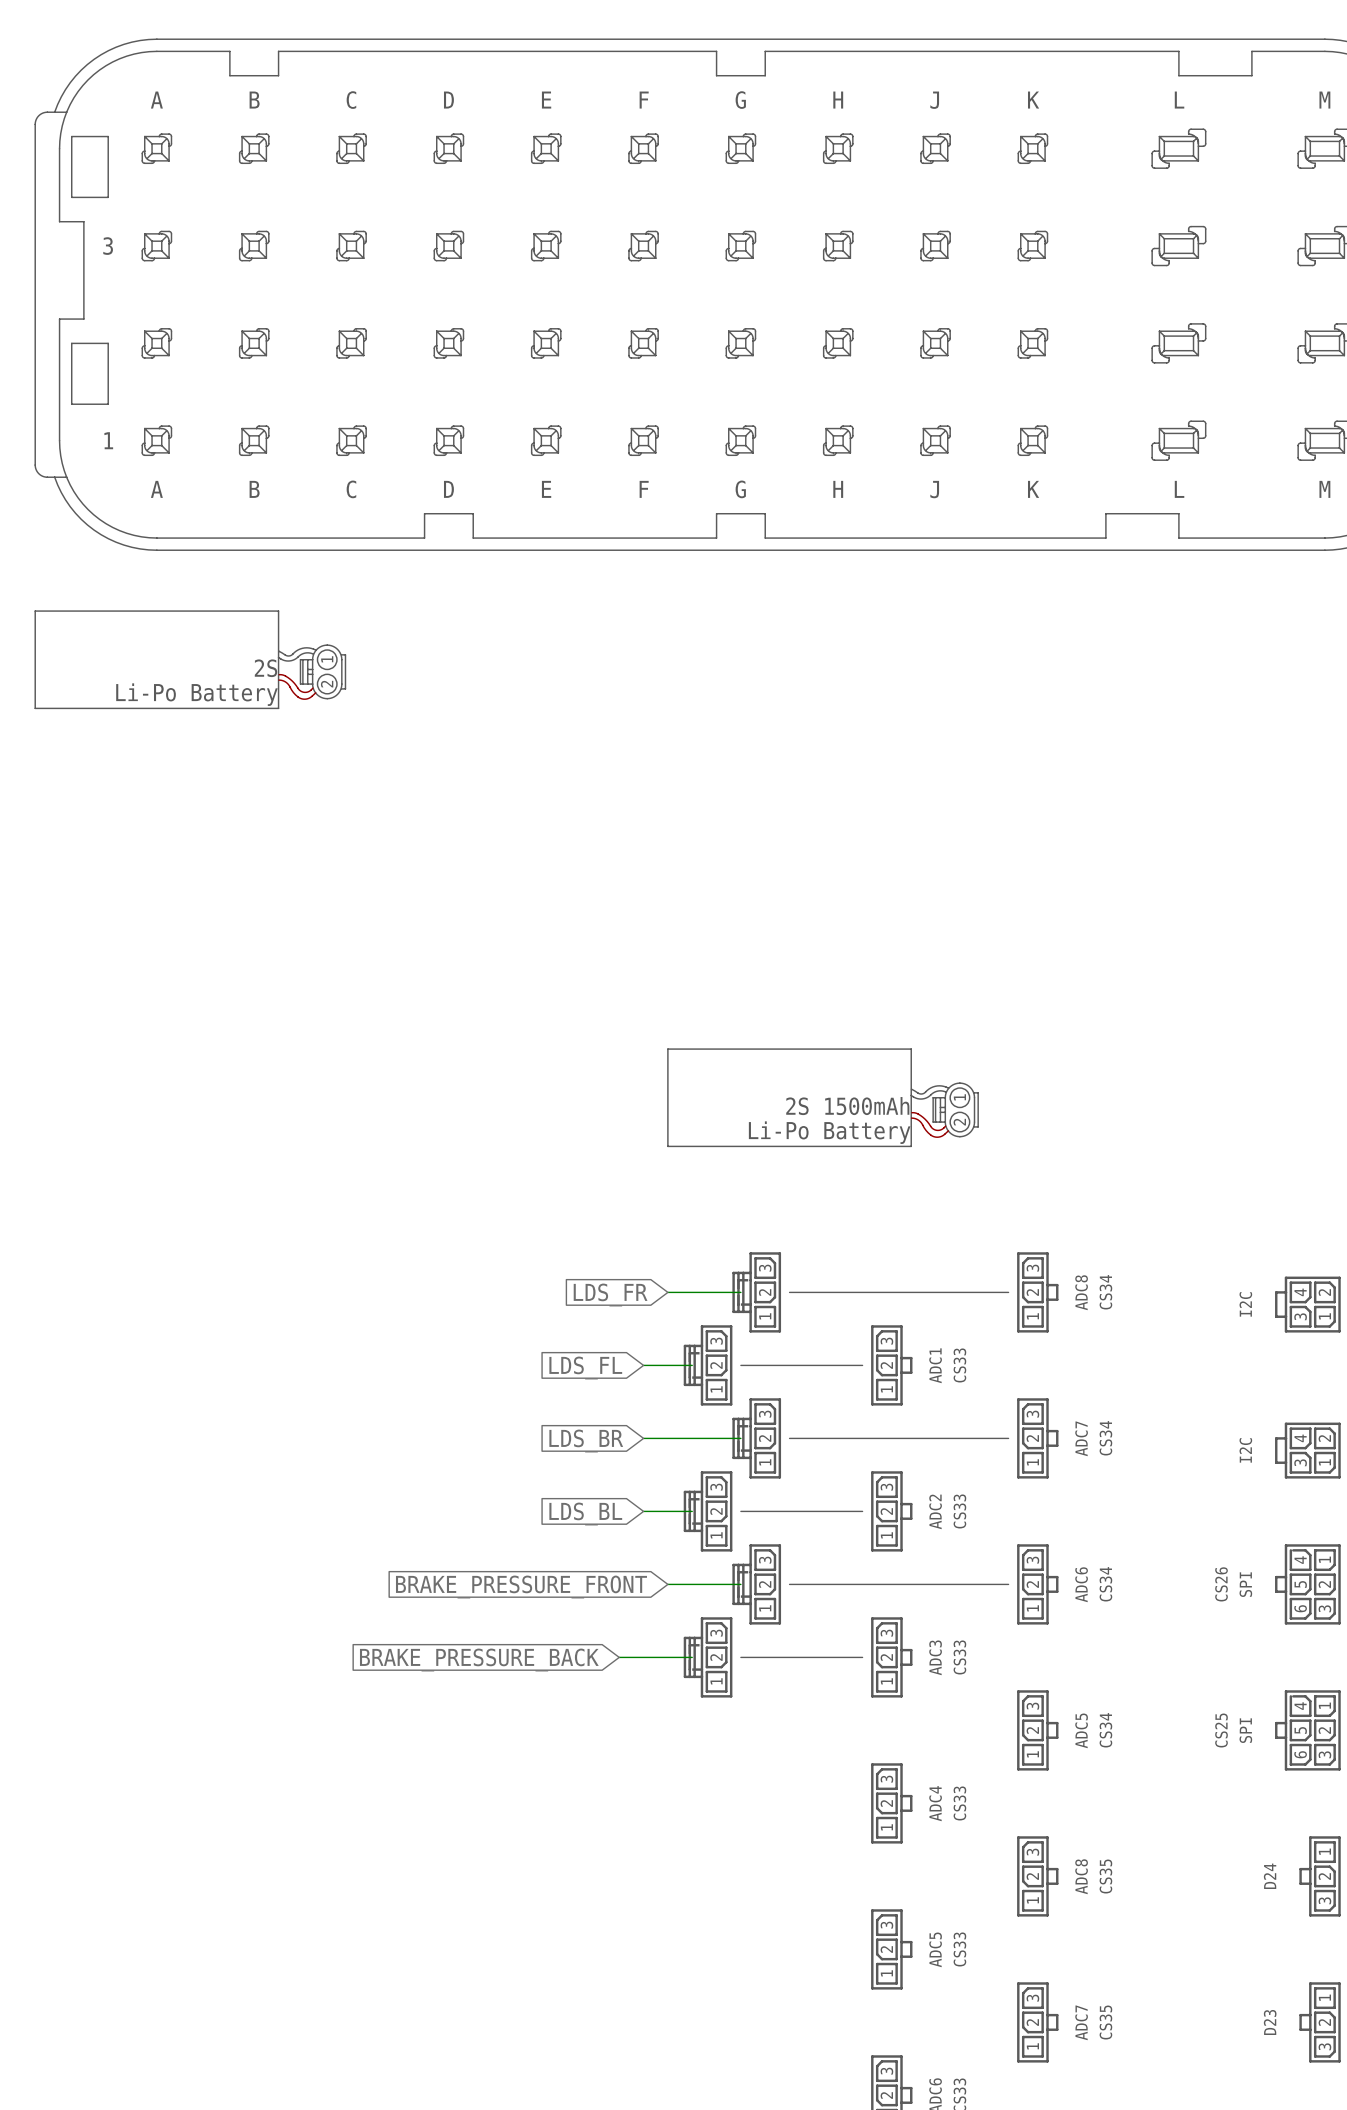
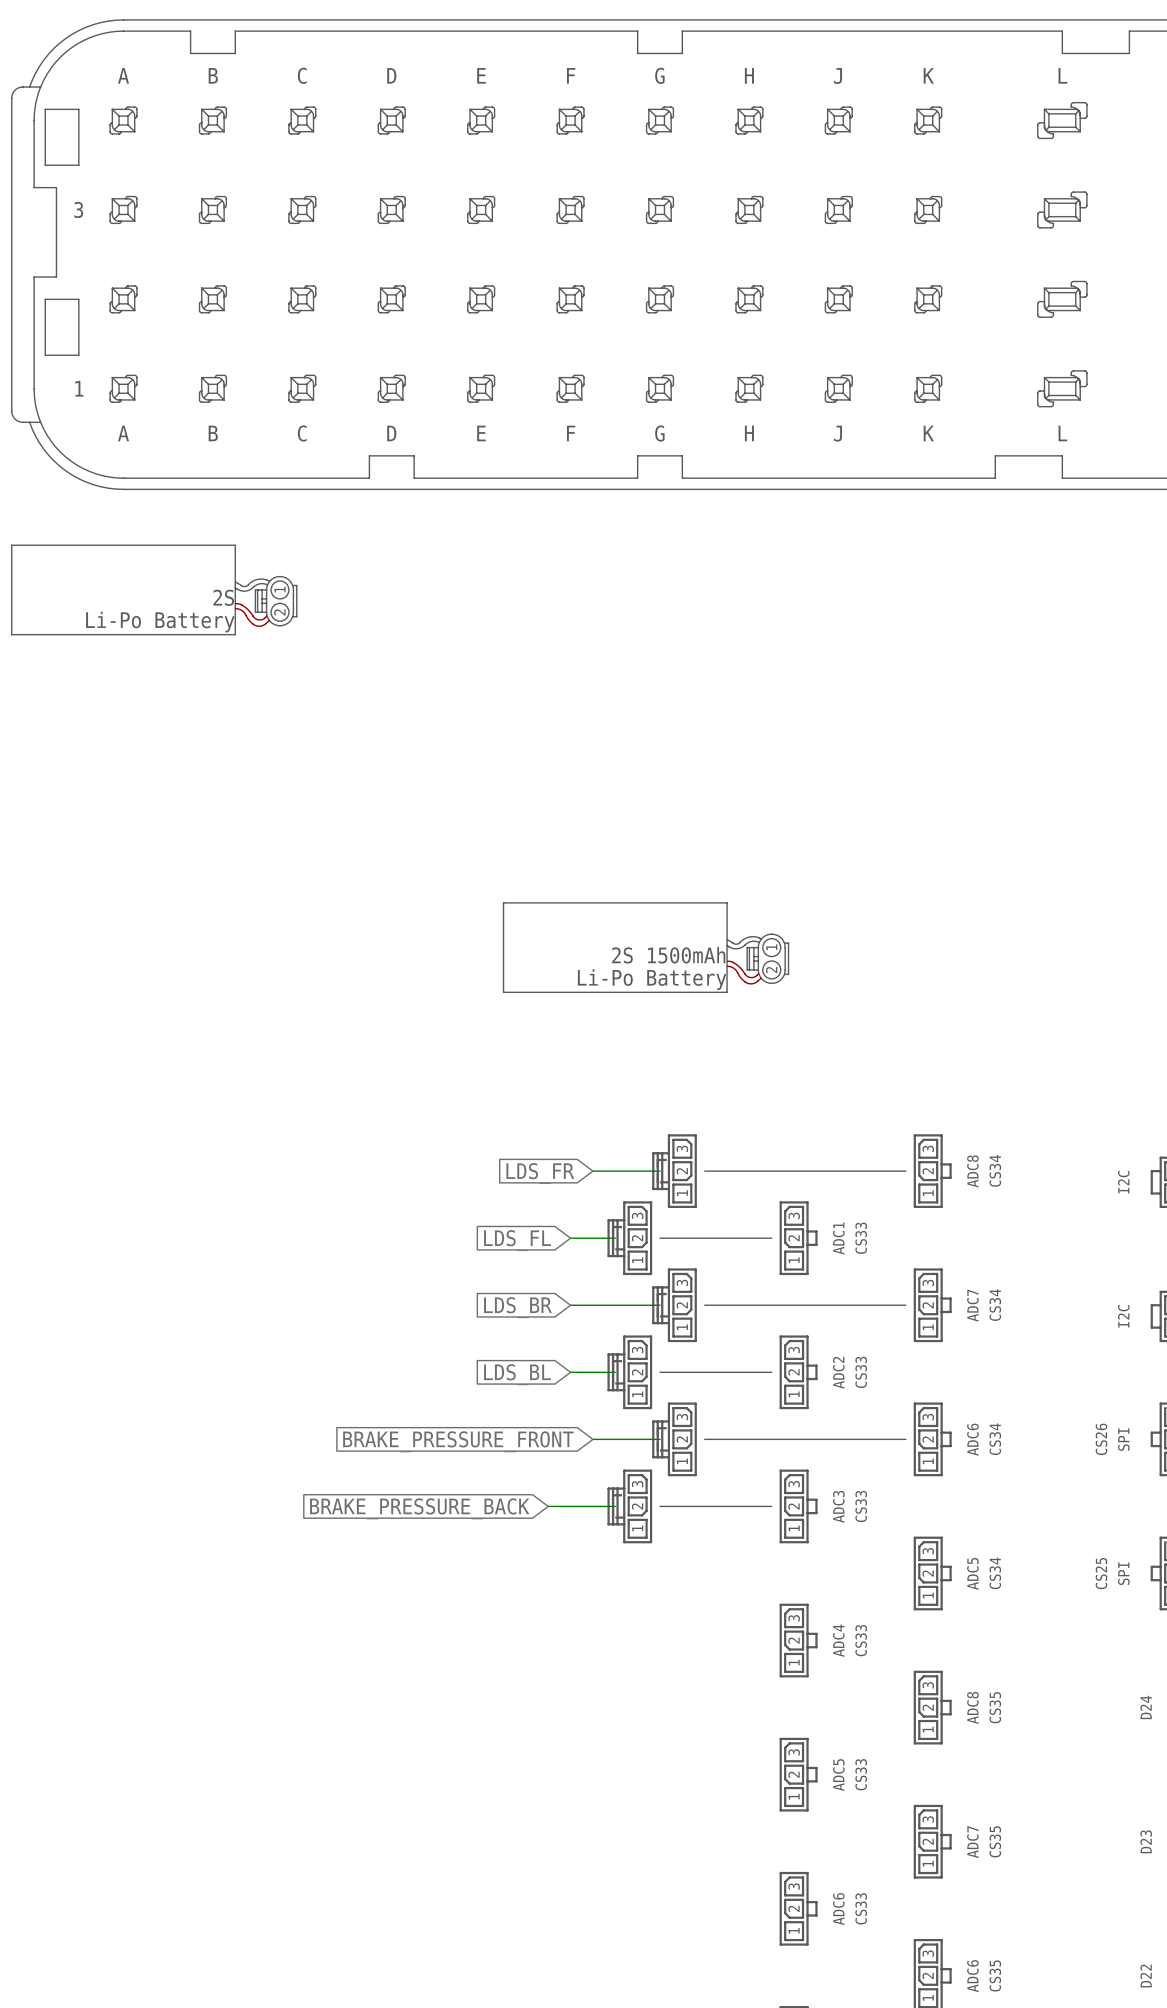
part position: (823, 1097) -> (646, 947)

